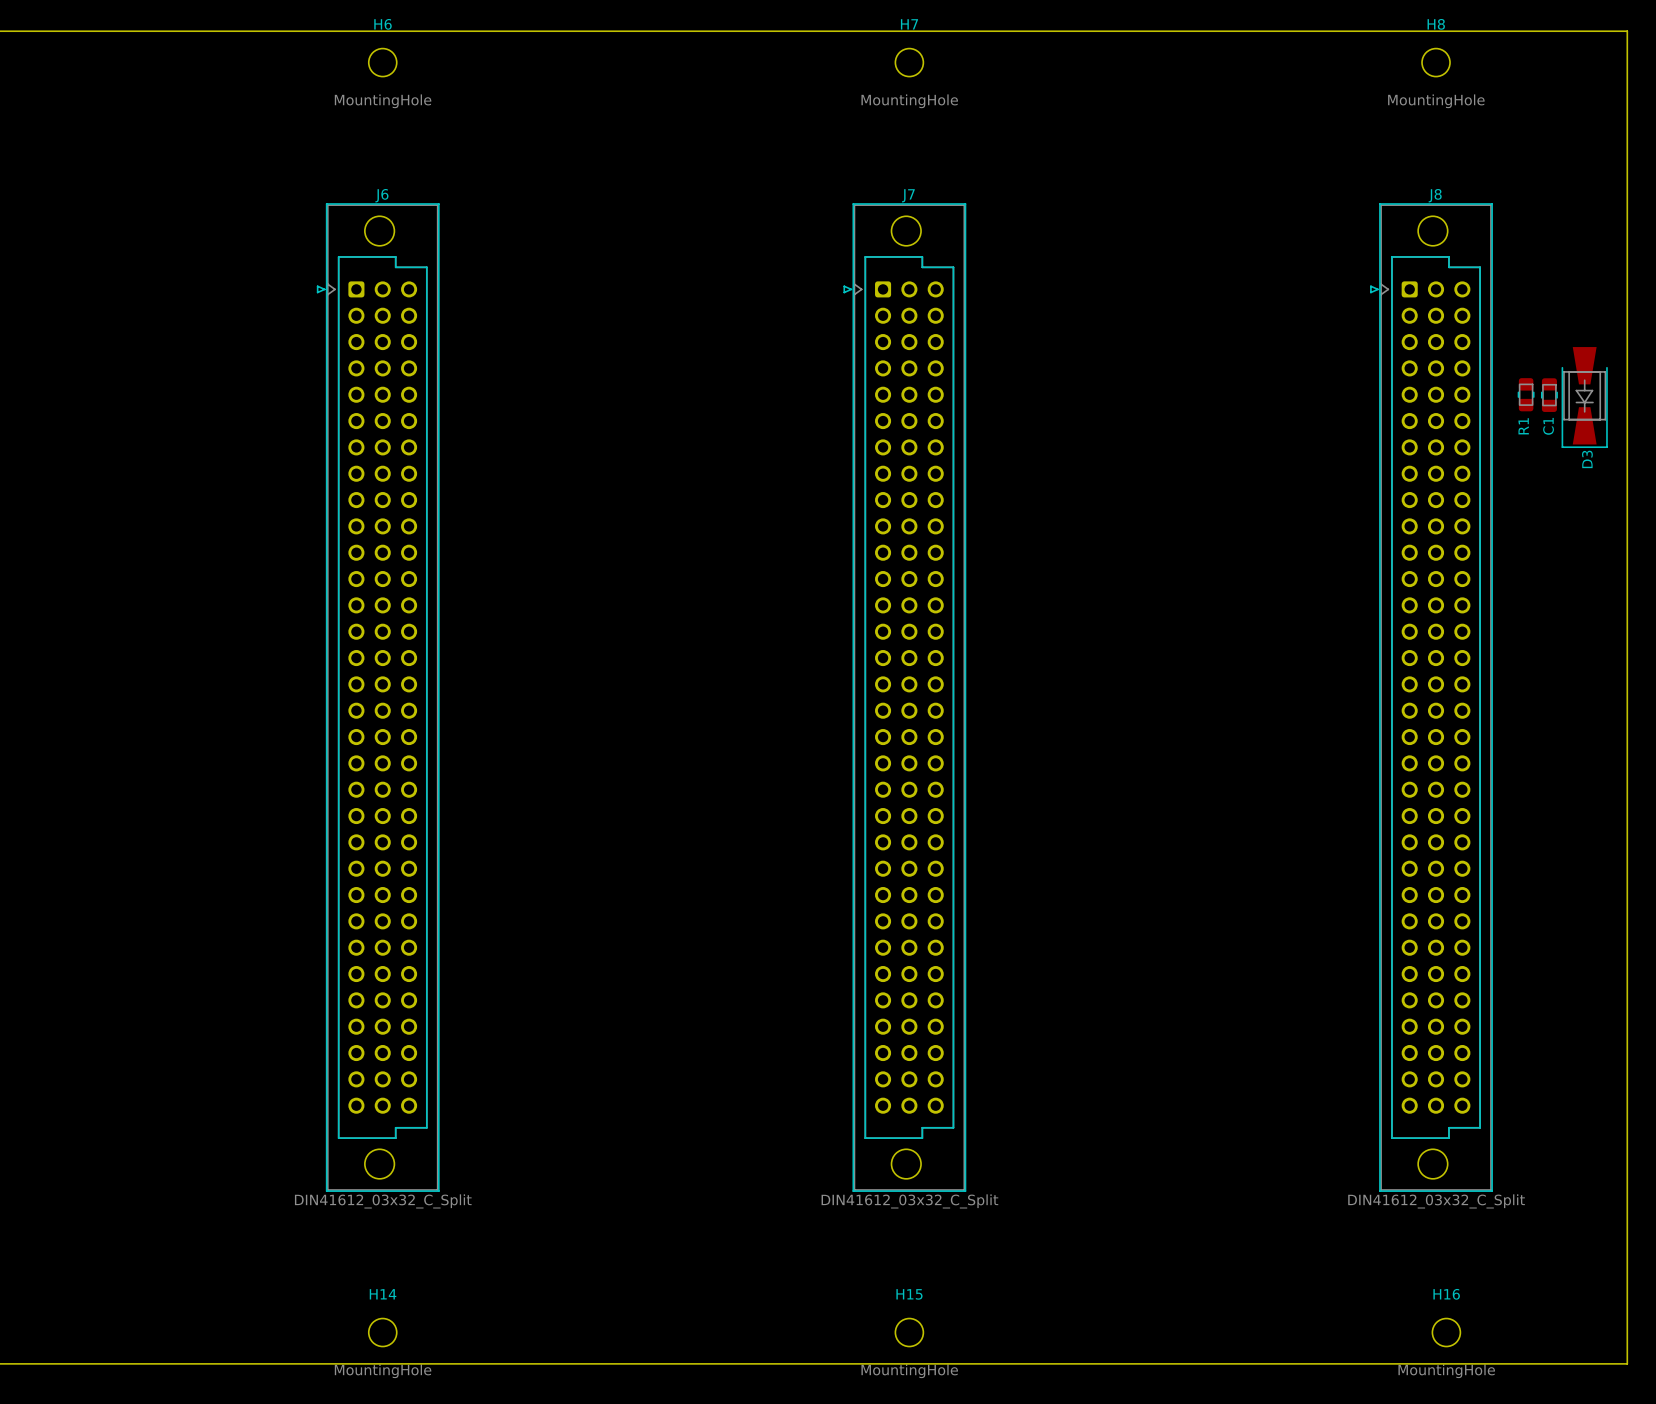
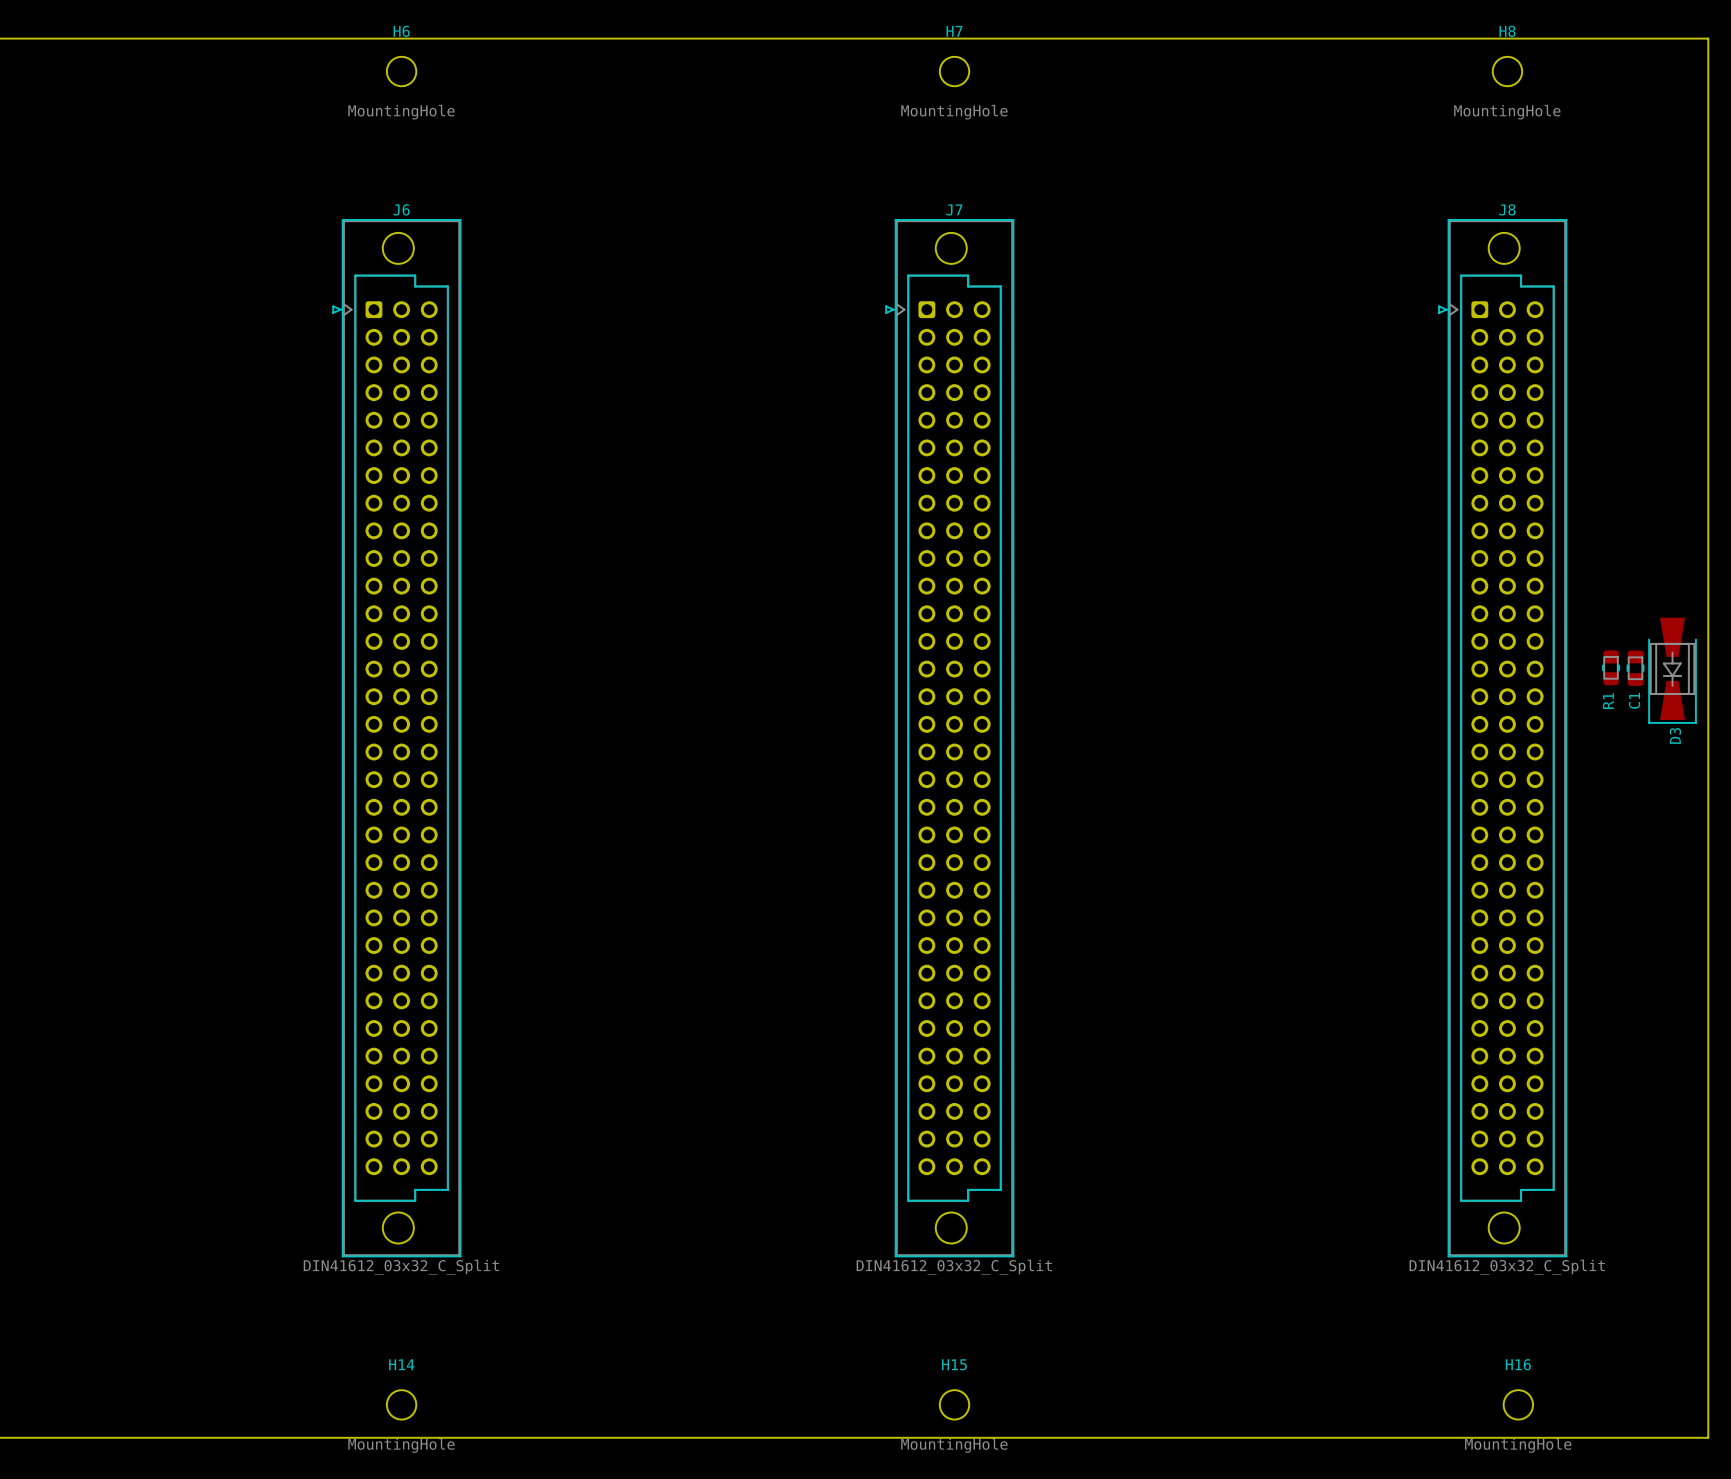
R1 position: (1526, 394) -> (1611, 667)
C1 position: (1549, 395) -> (1635, 668)
D3 position: (1584, 397) -> (1672, 670)

